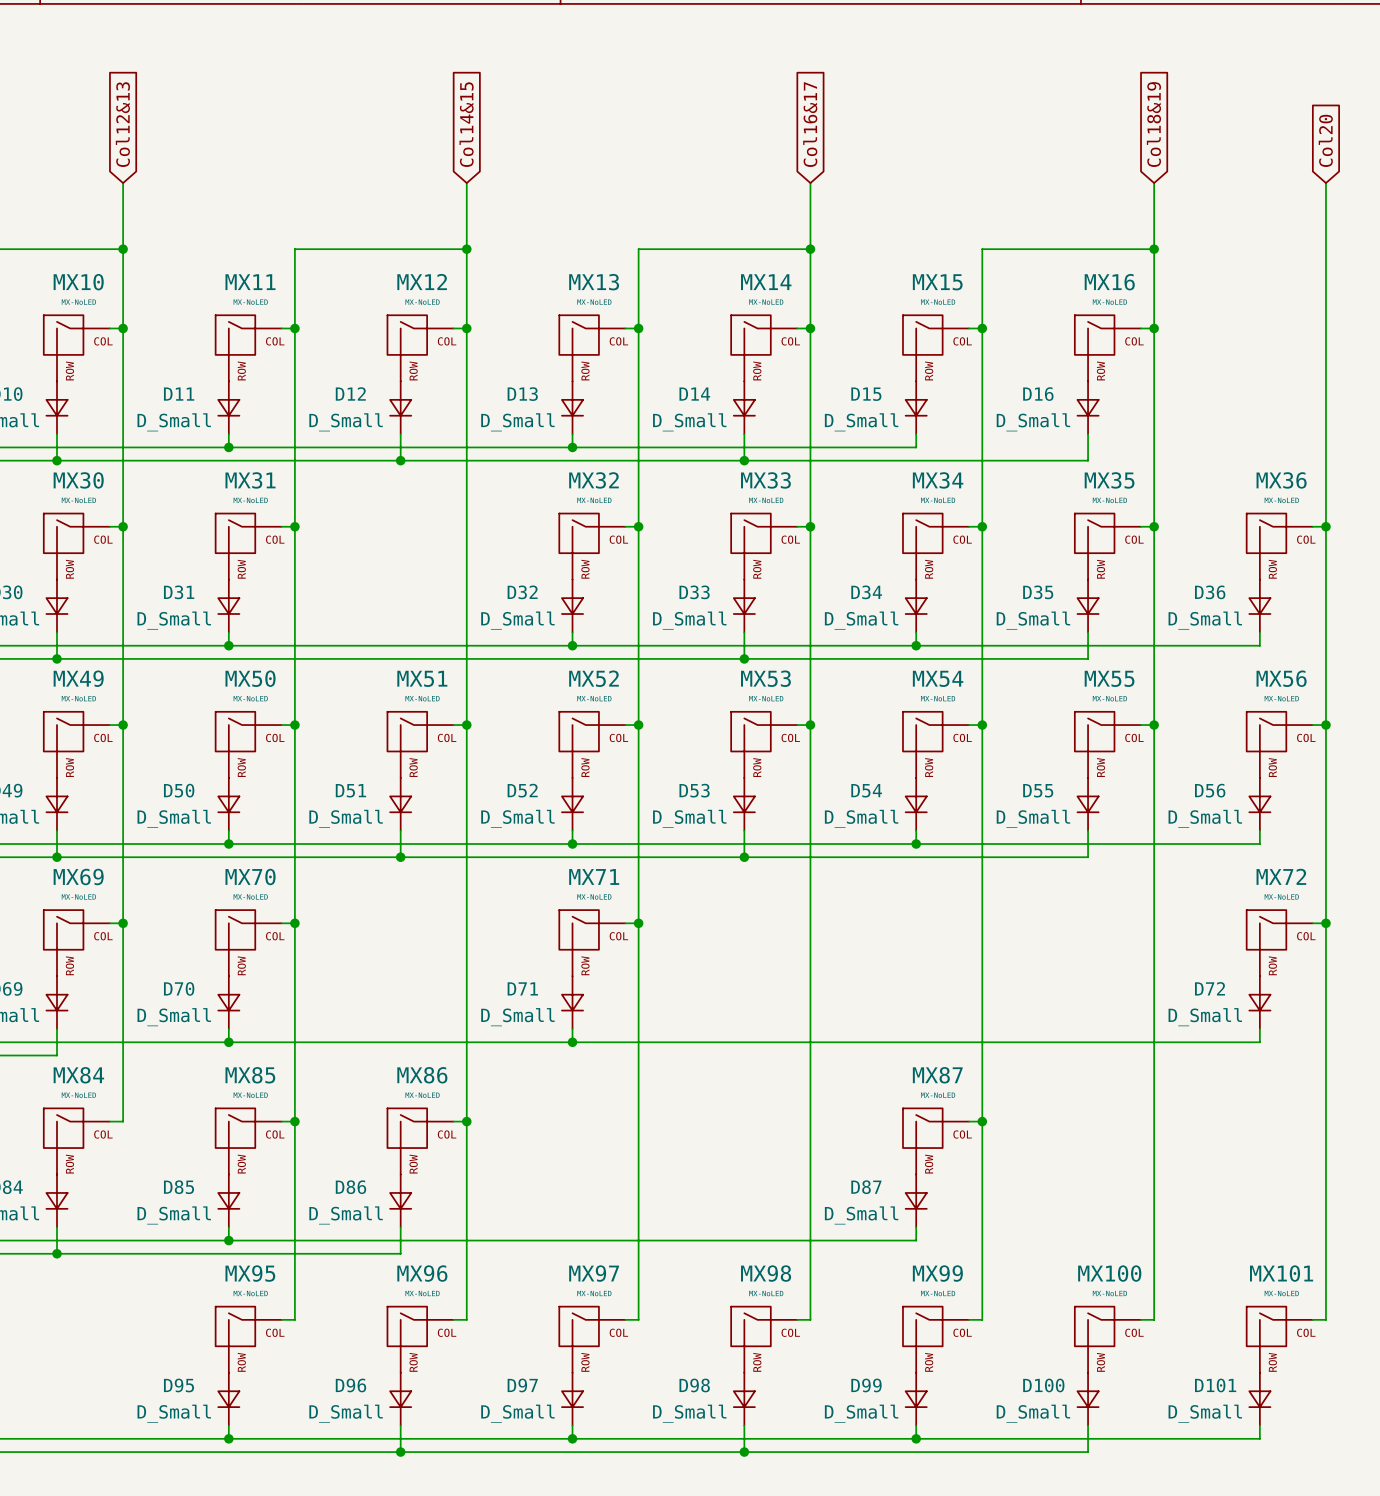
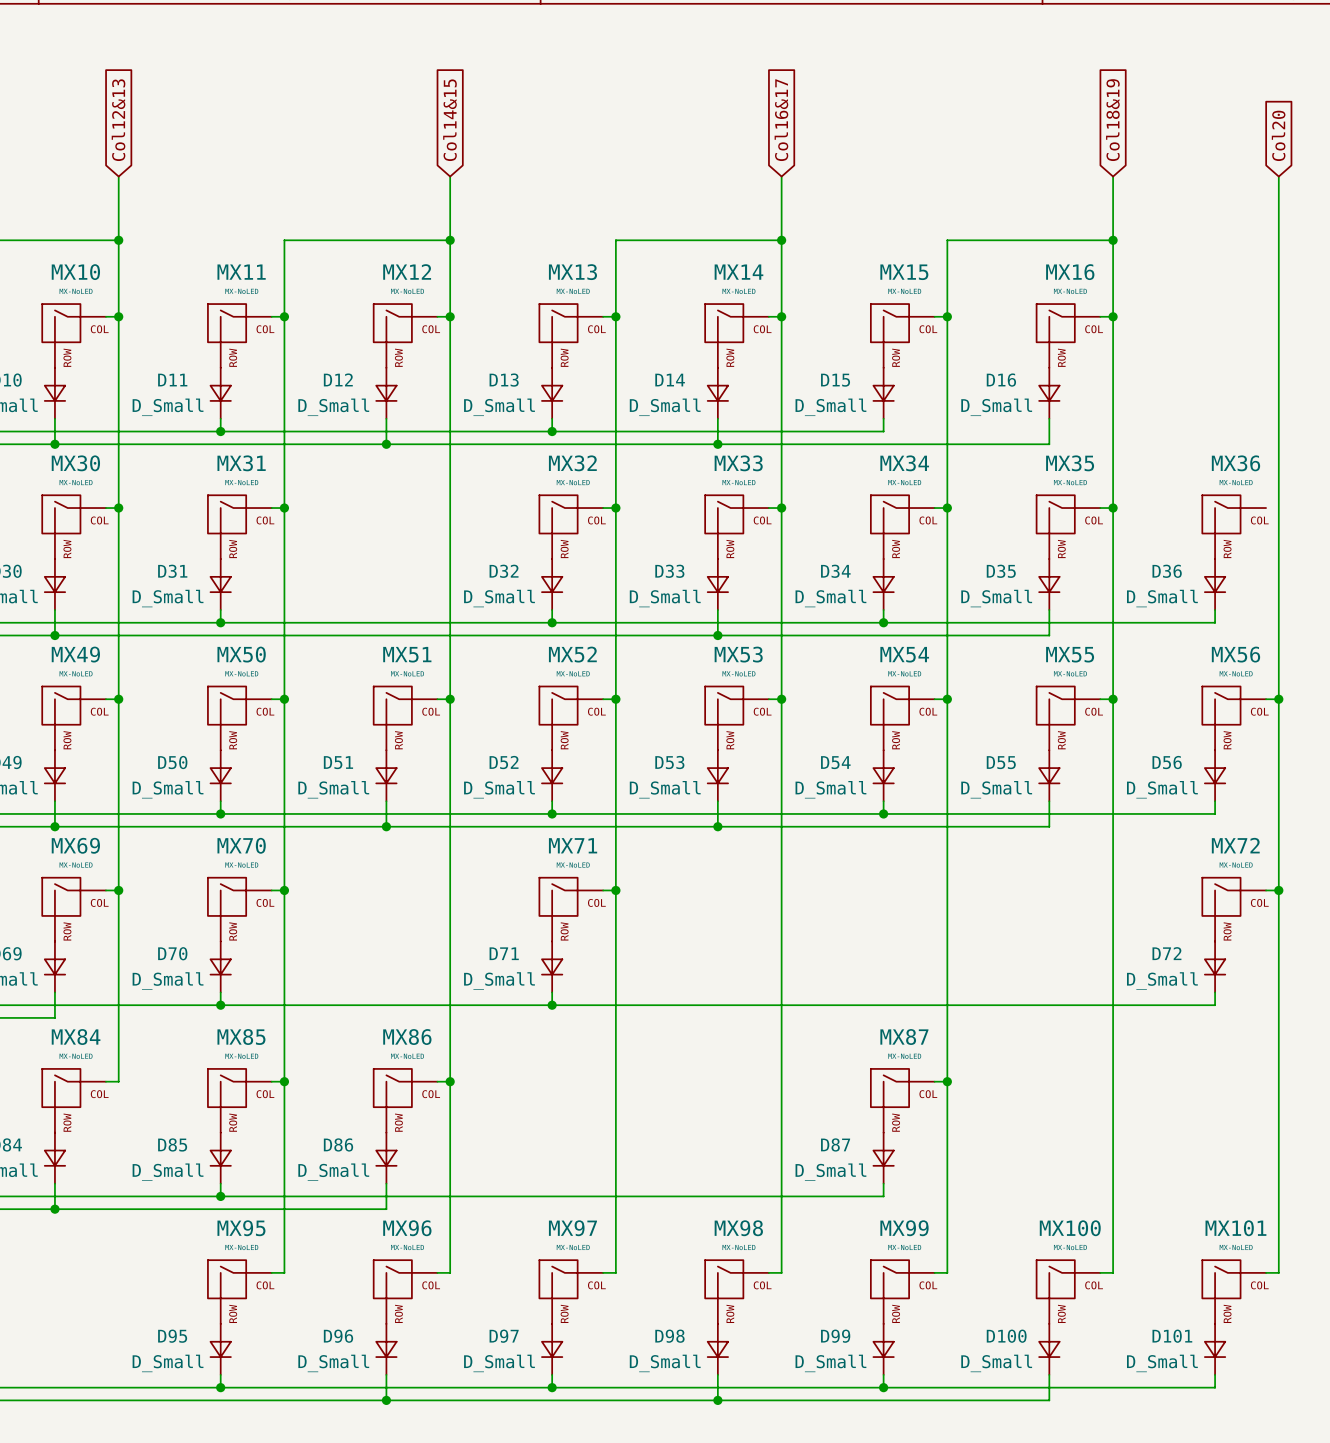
wire: (1312, 526) (1325, 526) -> none
junction: (1325, 526) -> none

